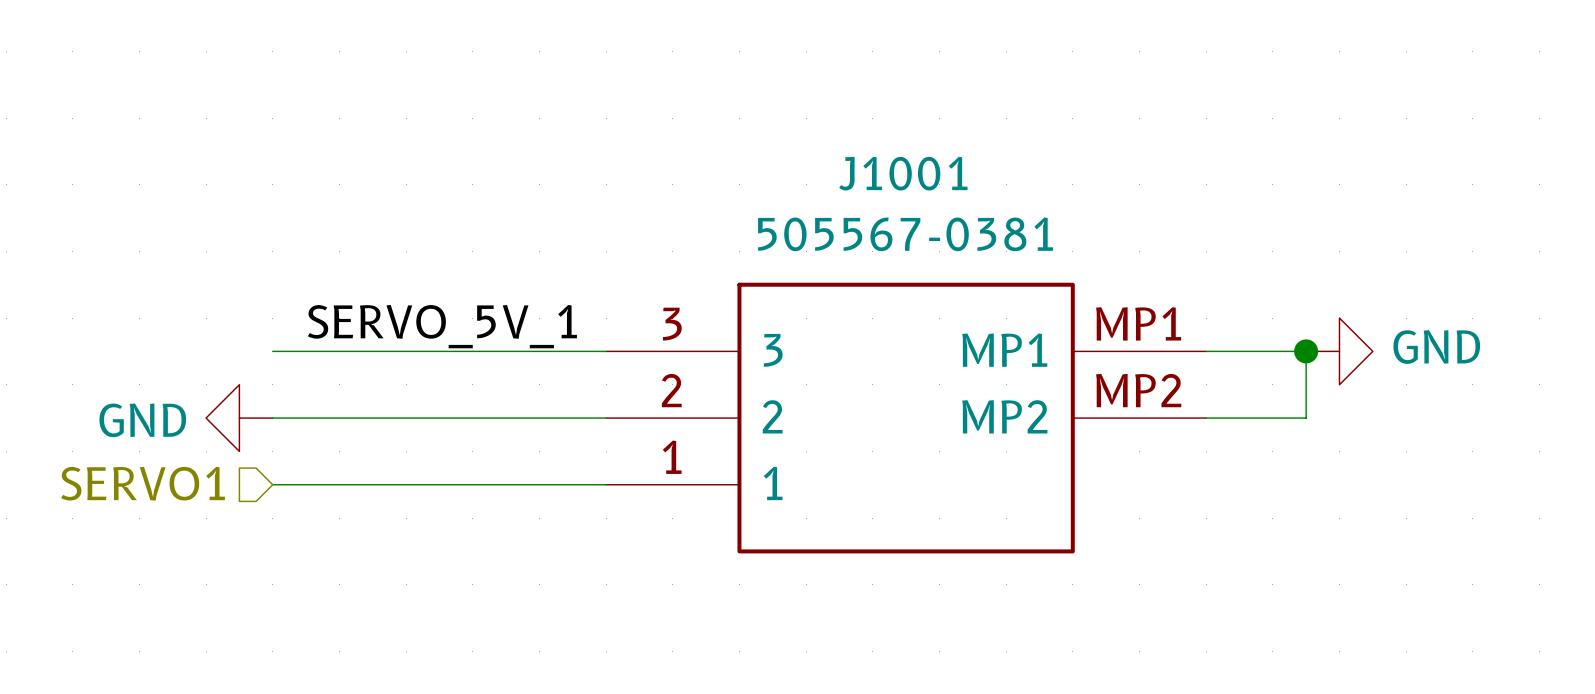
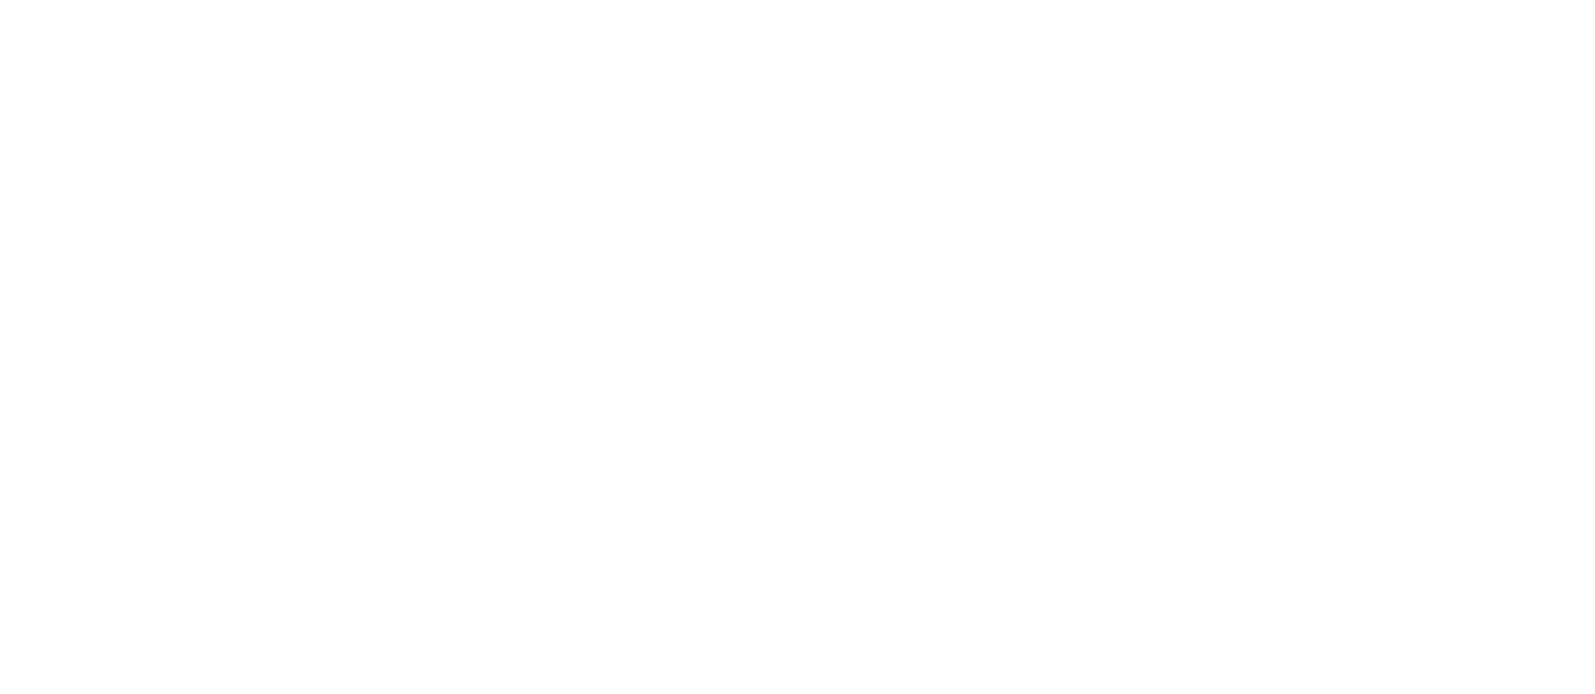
label: SERVO_5V_1 (442, 326) -> none
wire: (272, 351) (606, 351) -> none
wire: (1206, 351) (1306, 351) (1306, 418) (1206, 418) -> none
junction: (1306, 351) -> none
power symbol: GND (1339, 351) -> none
power symbol: GND (239, 418) -> none
wire: (272, 418) (606, 418) -> none
J1001: 505567-0381 (906, 418) -> none
hierarchical label: SERVO1 (143, 483) -> none
wire: (272, 484) (606, 484) -> none

